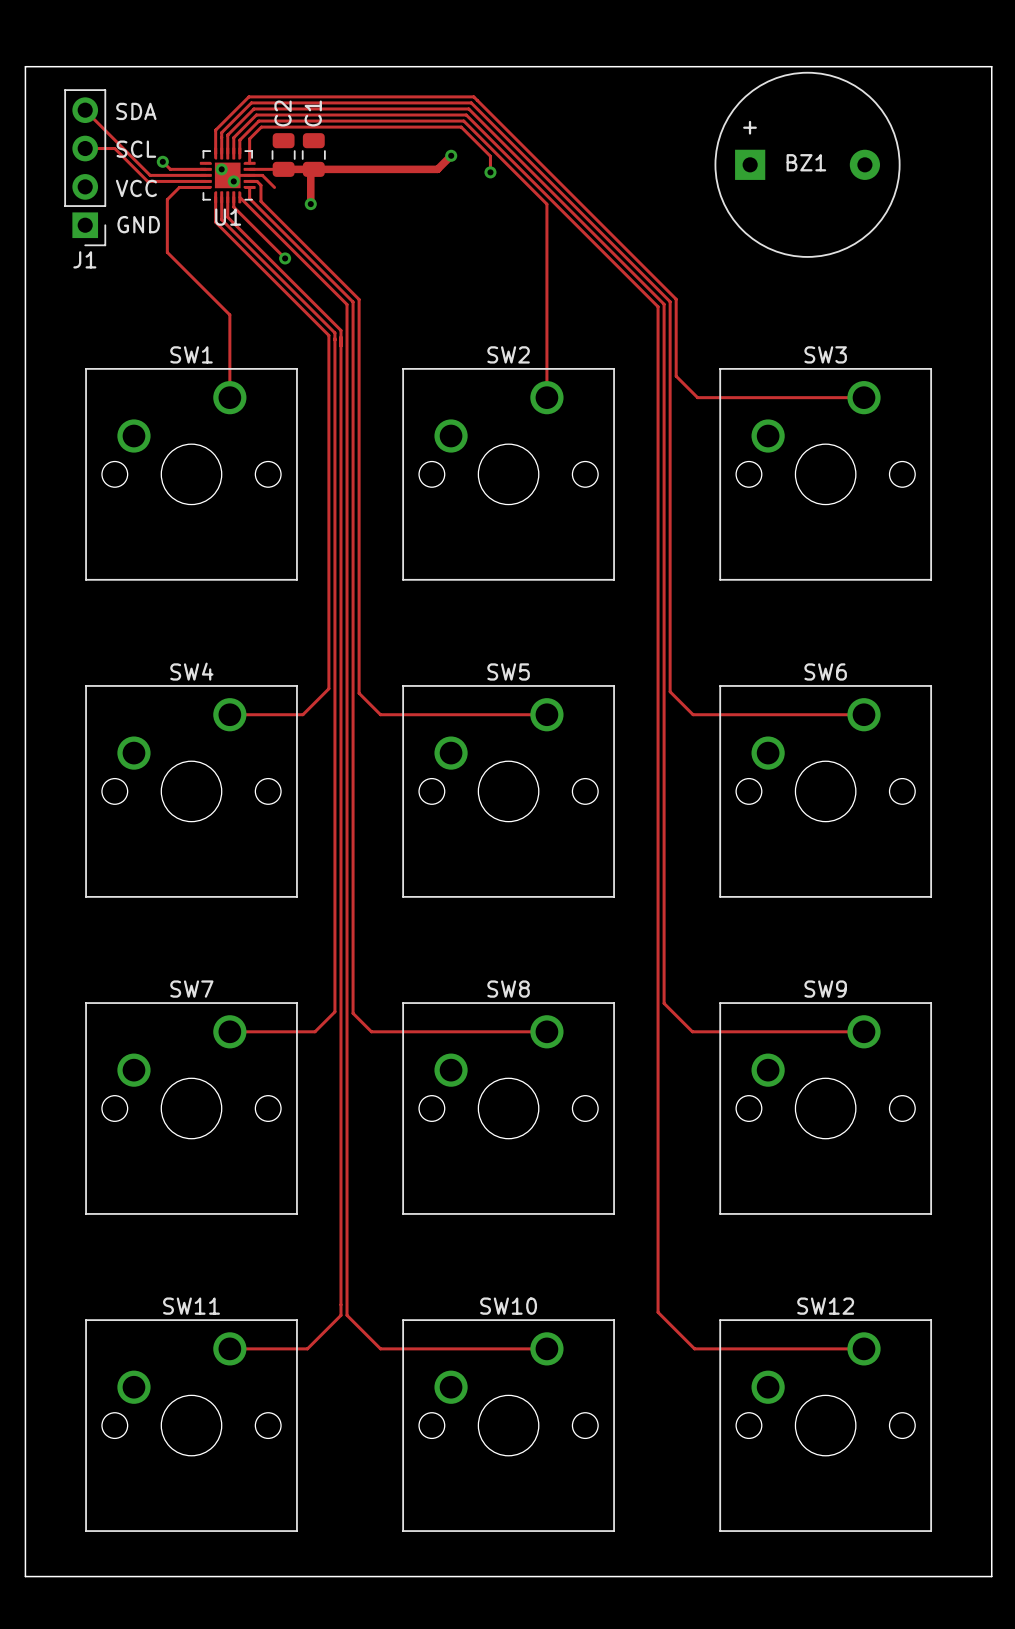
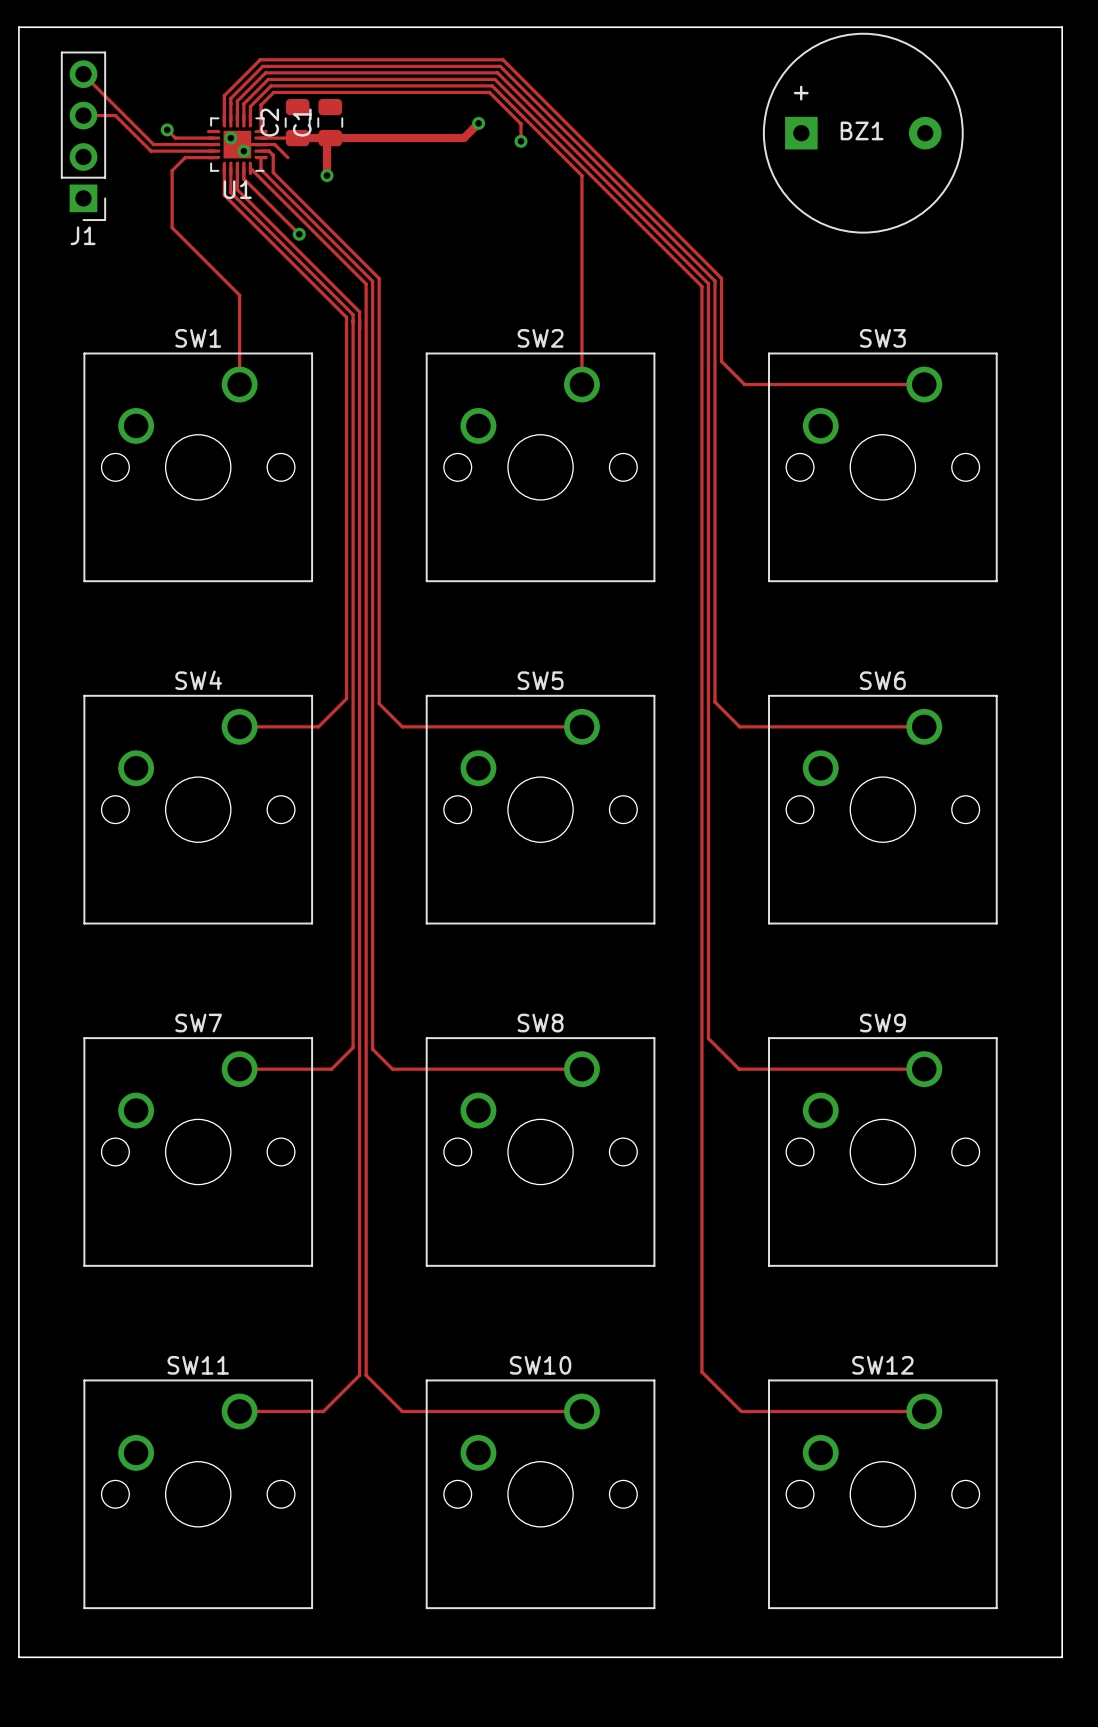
text: SDA (136, 111) -> none
C2 name position: C2 (283, 113) -> C2 (269, 122)
C1 name position: C1 (313, 113) -> C1 (302, 122)
text: SCL (136, 149) -> none
text: VCC (136, 188) -> none
text: GND (138, 224) -> none

